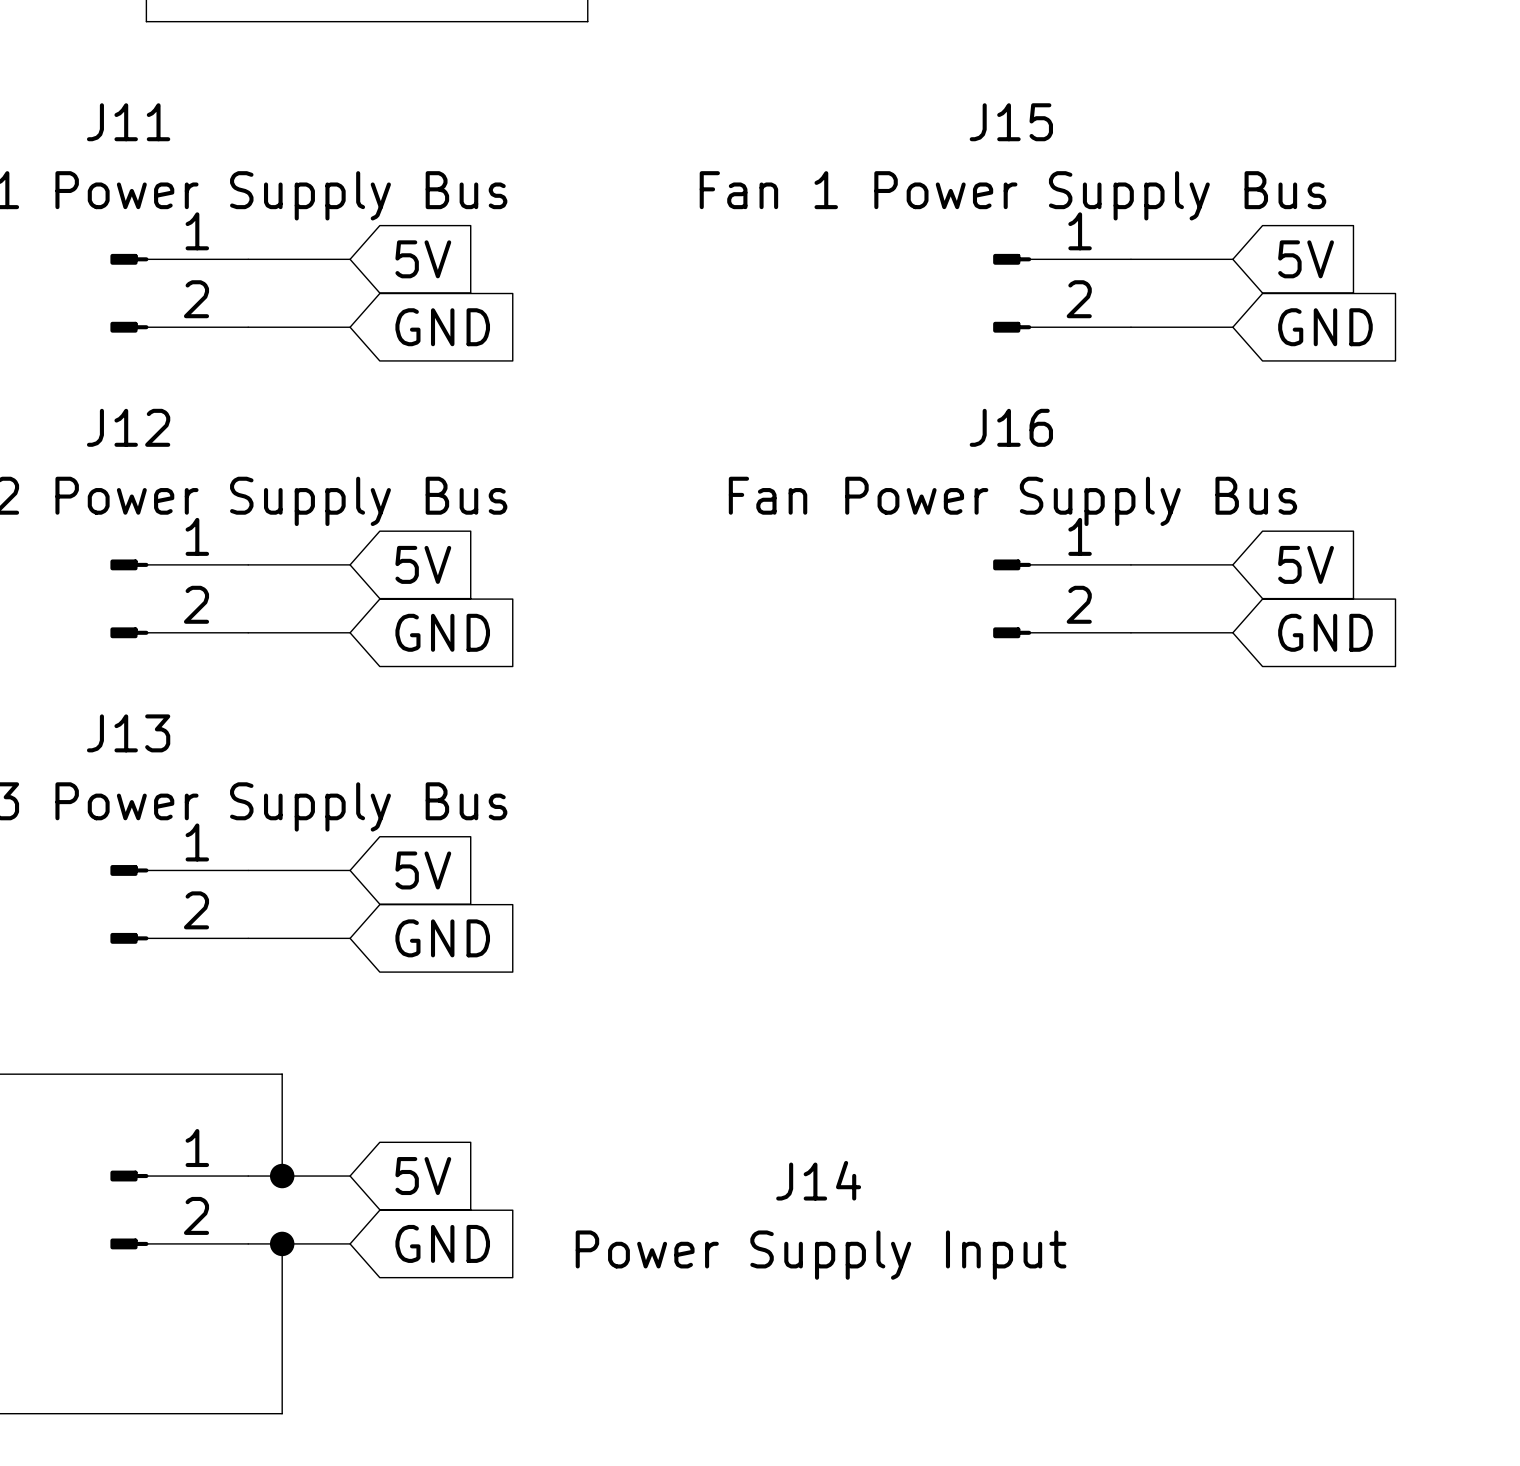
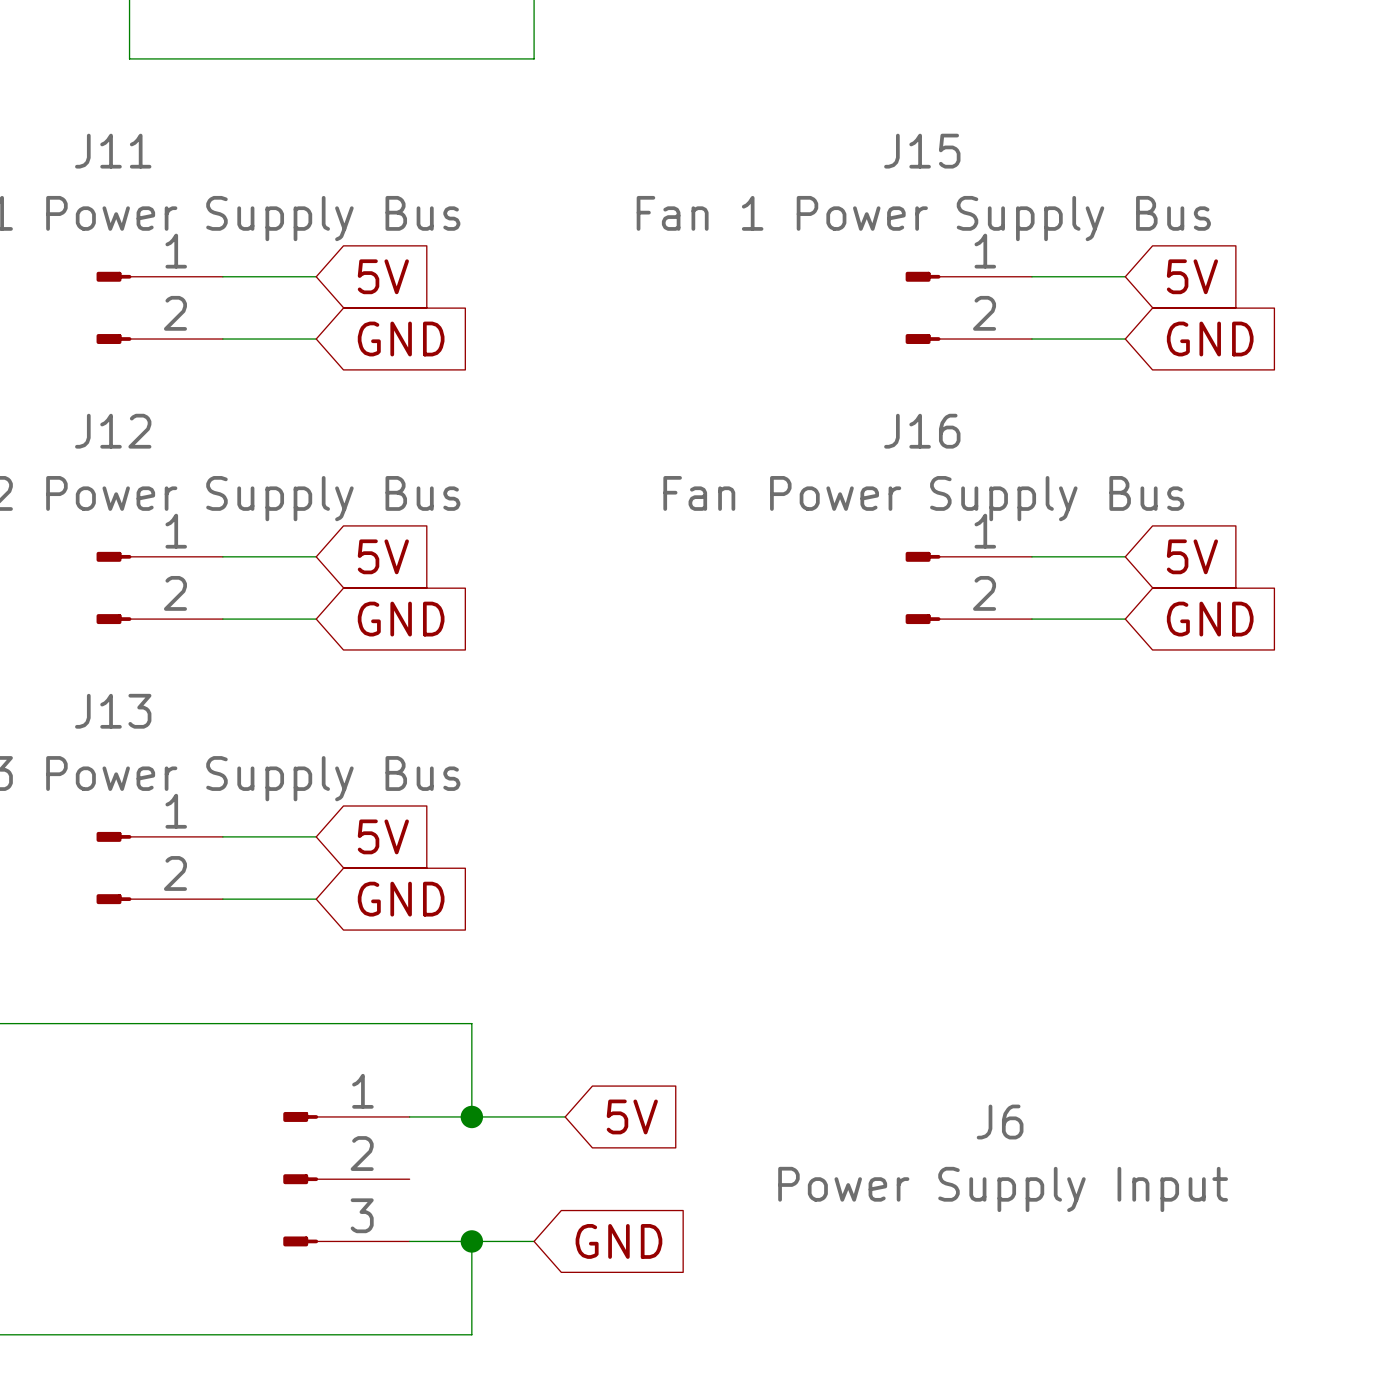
wire: (282, 1074) (282, 1176) -> (254, 1023) (471, 1023) (471, 1116)
wire: (248, 1176) (350, 1176) -> none
junction: (282, 1176) -> none
global label position: 5V (423, 1176) -> 5V (632, 1116)
wire: none -> (409, 1116) (565, 1116)
junction: none -> (471, 1116)
J14: Power Supply Input (179, 1209) -> none
wire: (248, 1243) (350, 1243) -> none
wire: (282, 1243) (282, 1413) -> (471, 1241) (471, 1334) (254, 1334)
junction: (282, 1243) -> none
J6: none -> Power Supply Input (346, 1179)
global label position: GND (442, 1243) -> GND (618, 1241)
wire: none -> (409, 1241) (534, 1241)
junction: none -> (471, 1241)

